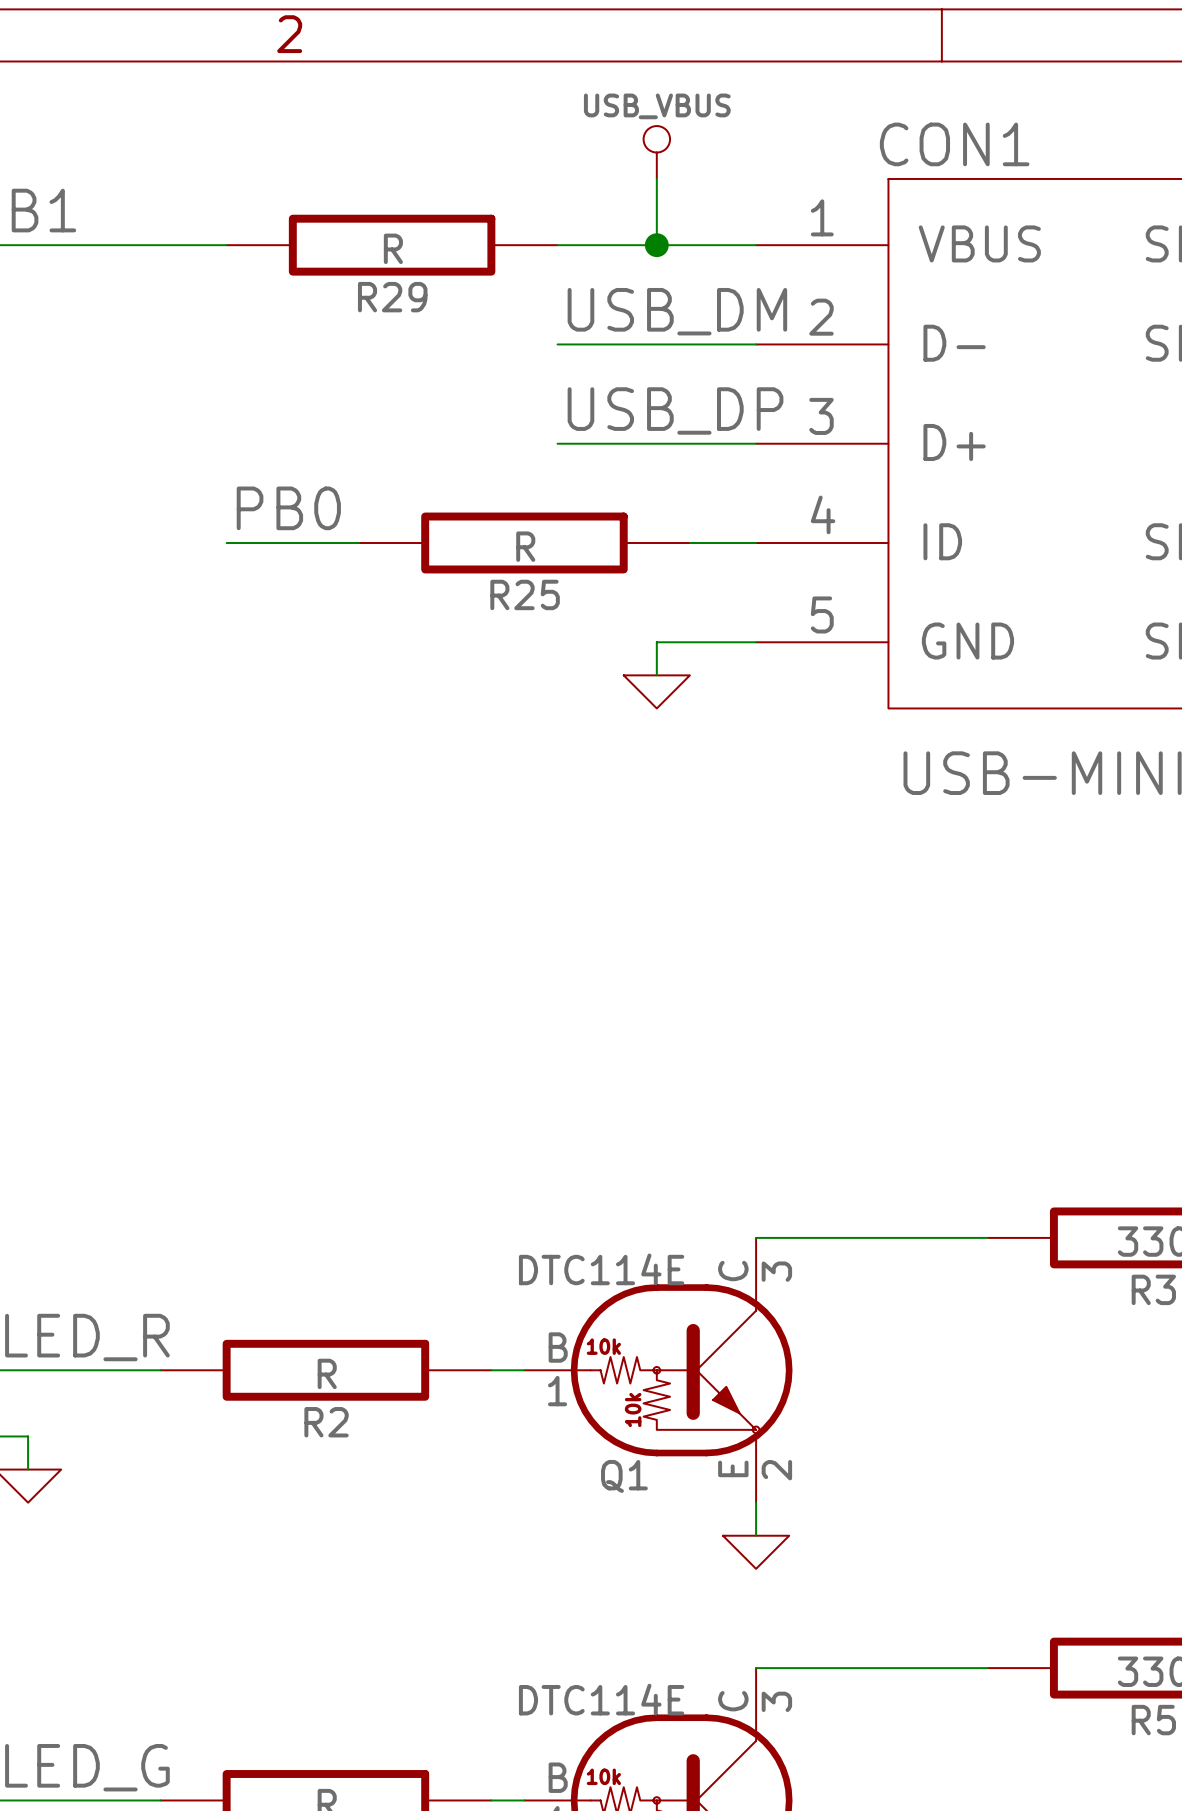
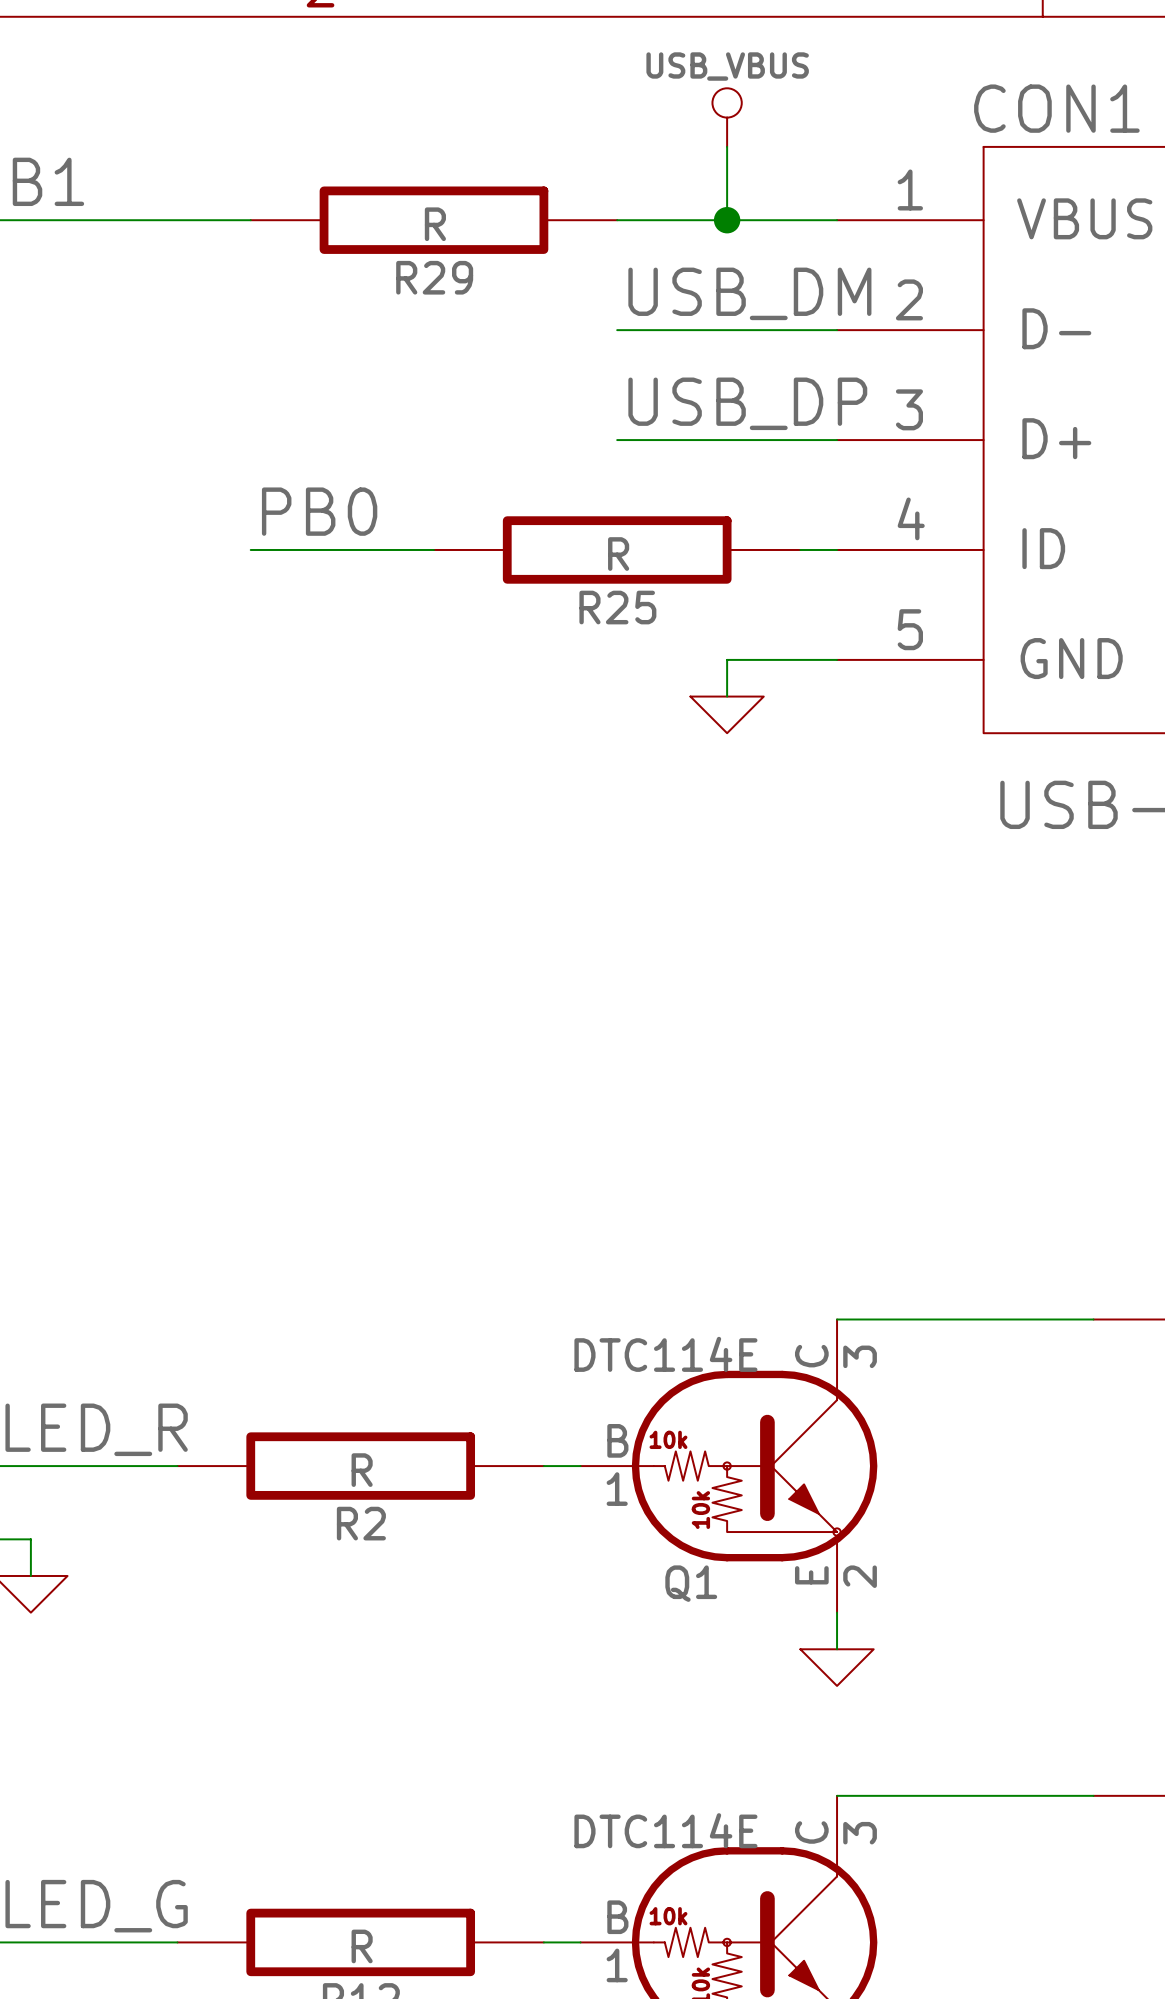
R25 position: (524, 543) -> (617, 549)

